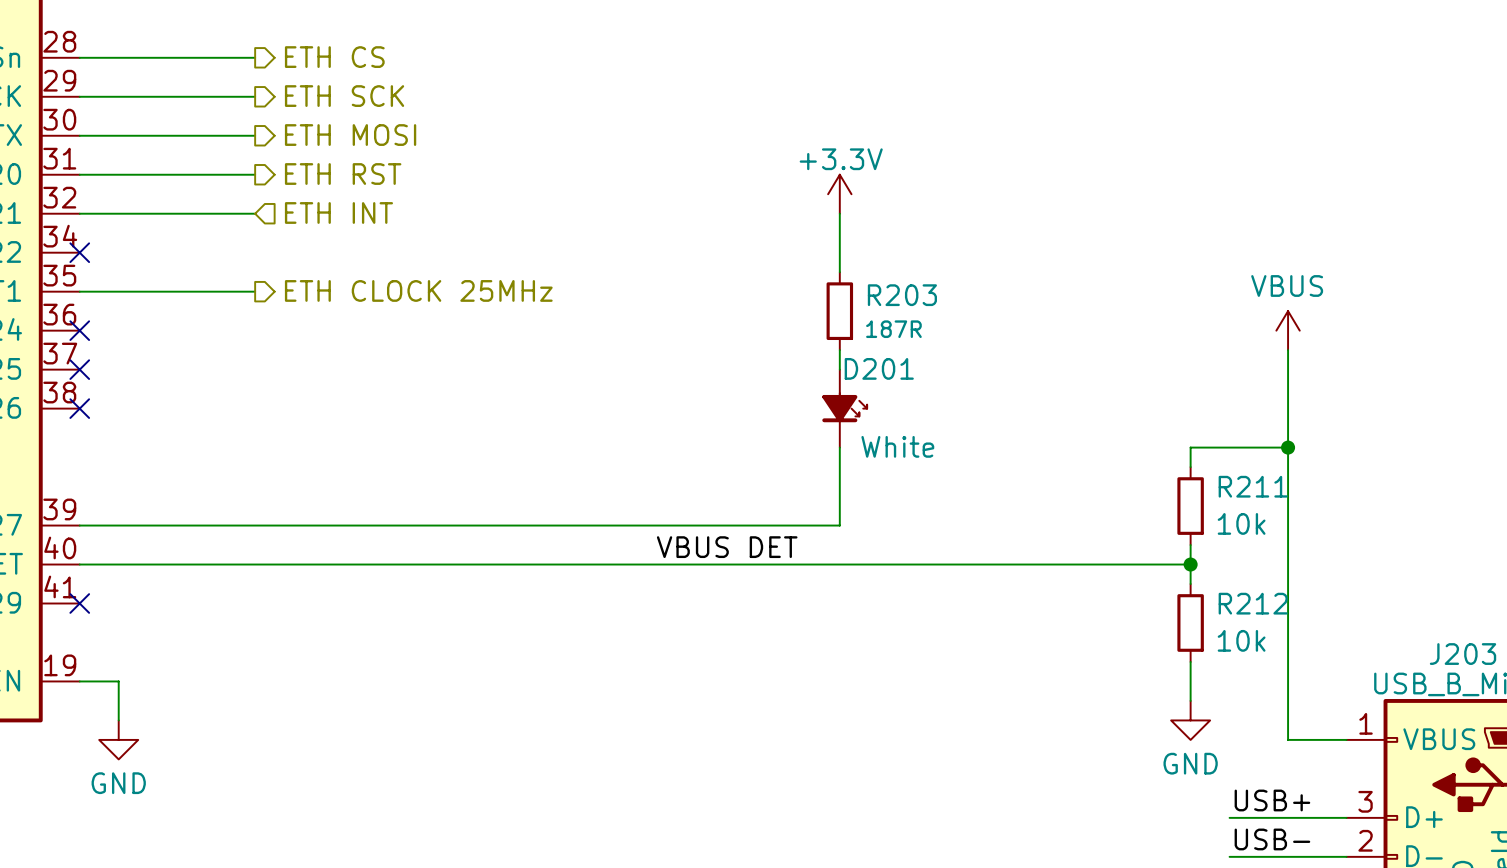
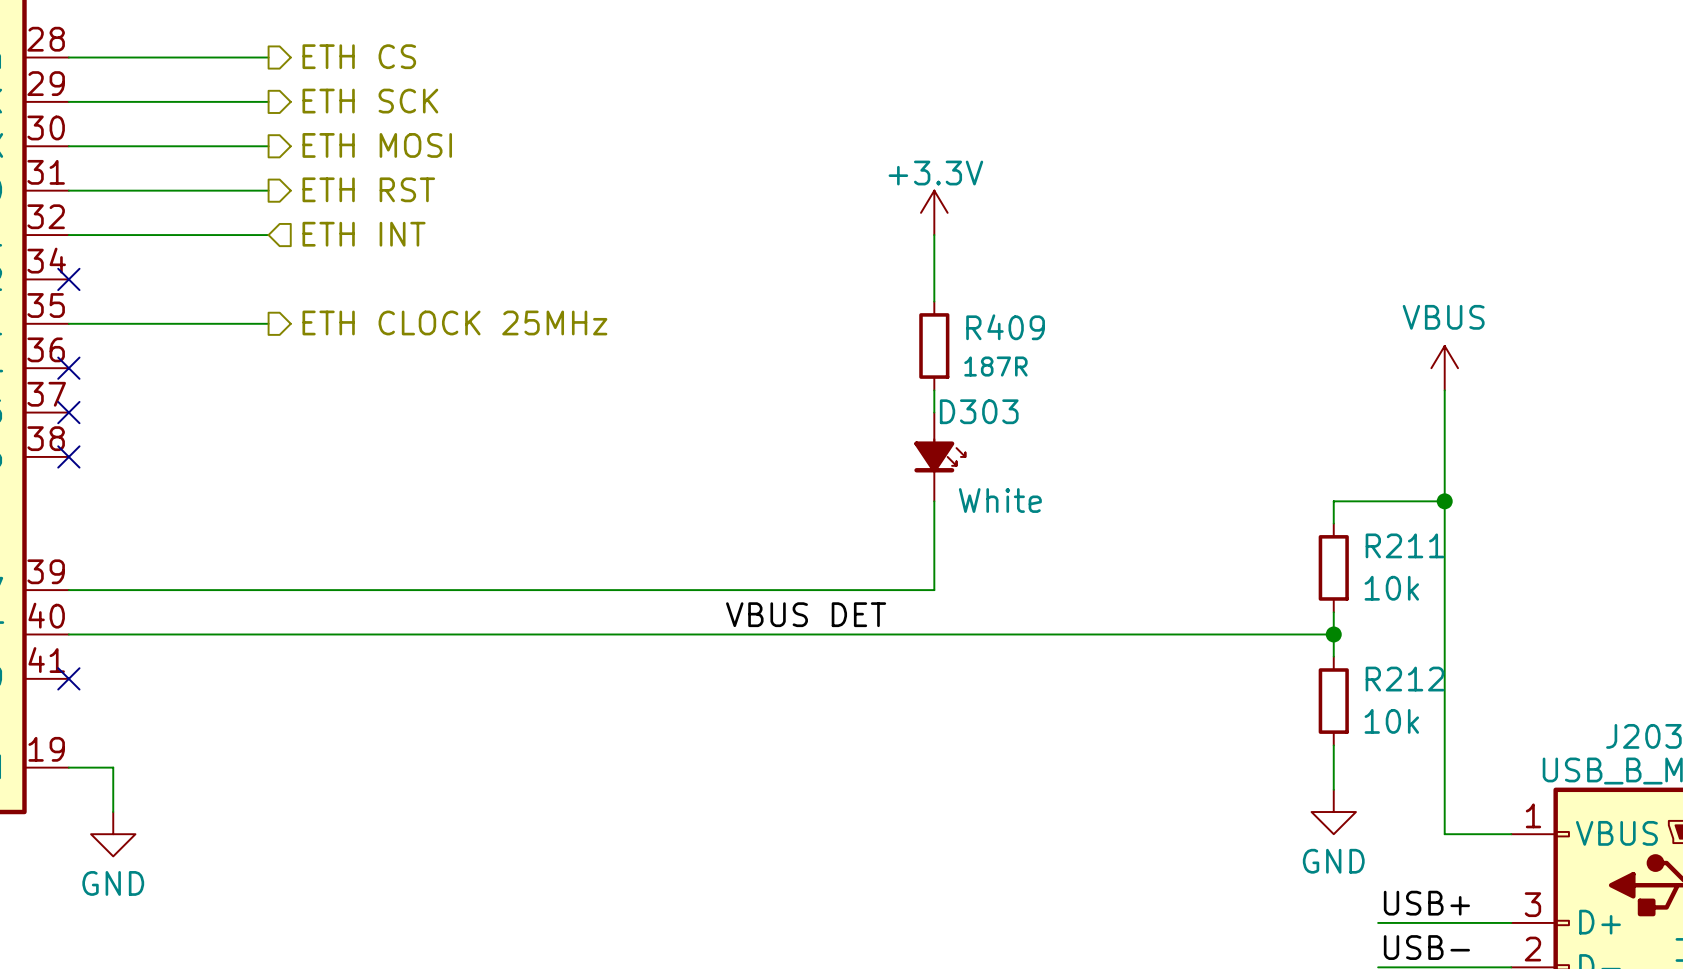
R203 name: R203 (902, 295) -> R409 (1005, 327)
D201 name: D201 (879, 368) -> D303 (979, 411)

